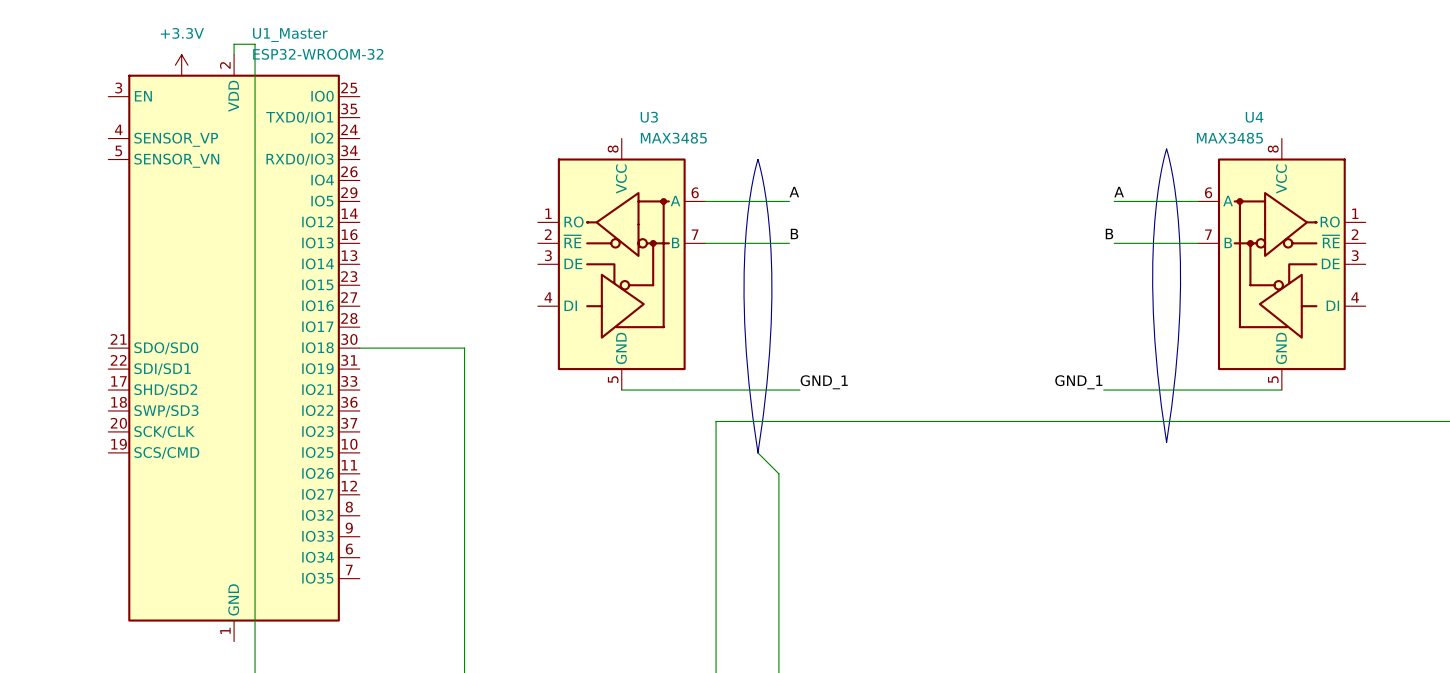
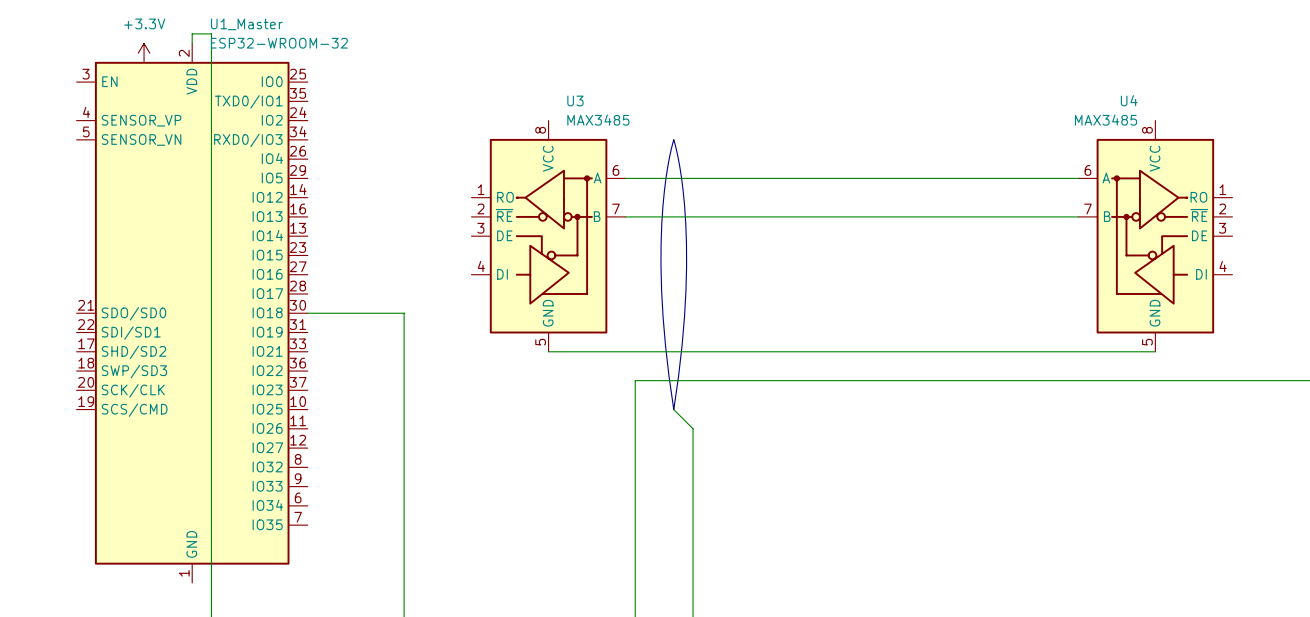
line: (1166, 149) (1176, 204) (1180, 286) (1175, 372) (1166, 442) (1157, 372) (1152, 286) (1156, 204) (1166, 149) -> none
label: A (794, 192) -> none
label: A (1119, 192) -> none
wire: none -> (702, 178) (1001, 178)
label: B (794, 233) -> none
label: B (1109, 233) -> none
wire: none -> (702, 216) (1001, 216)
label: GND_1 (824, 382) -> none
label: GND_1 (1078, 382) -> none
wire: none -> (712, 351) (991, 351)

